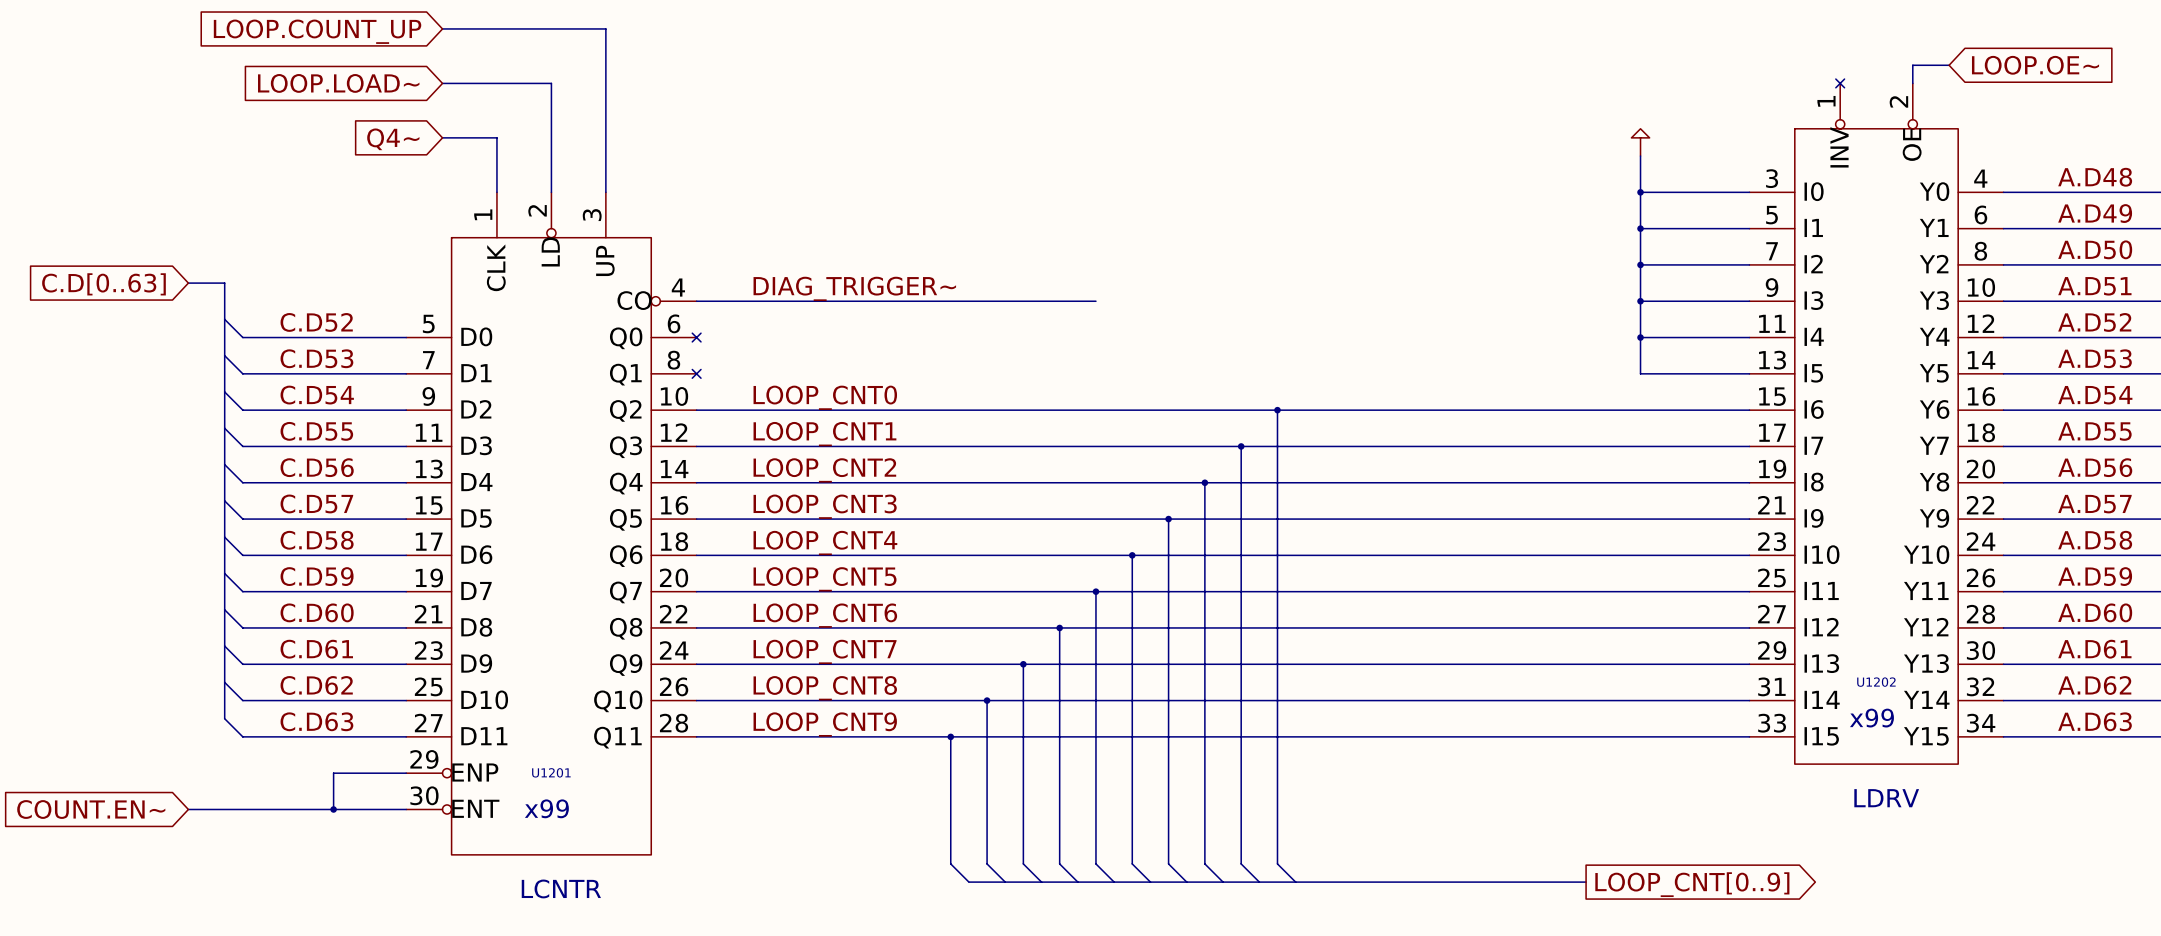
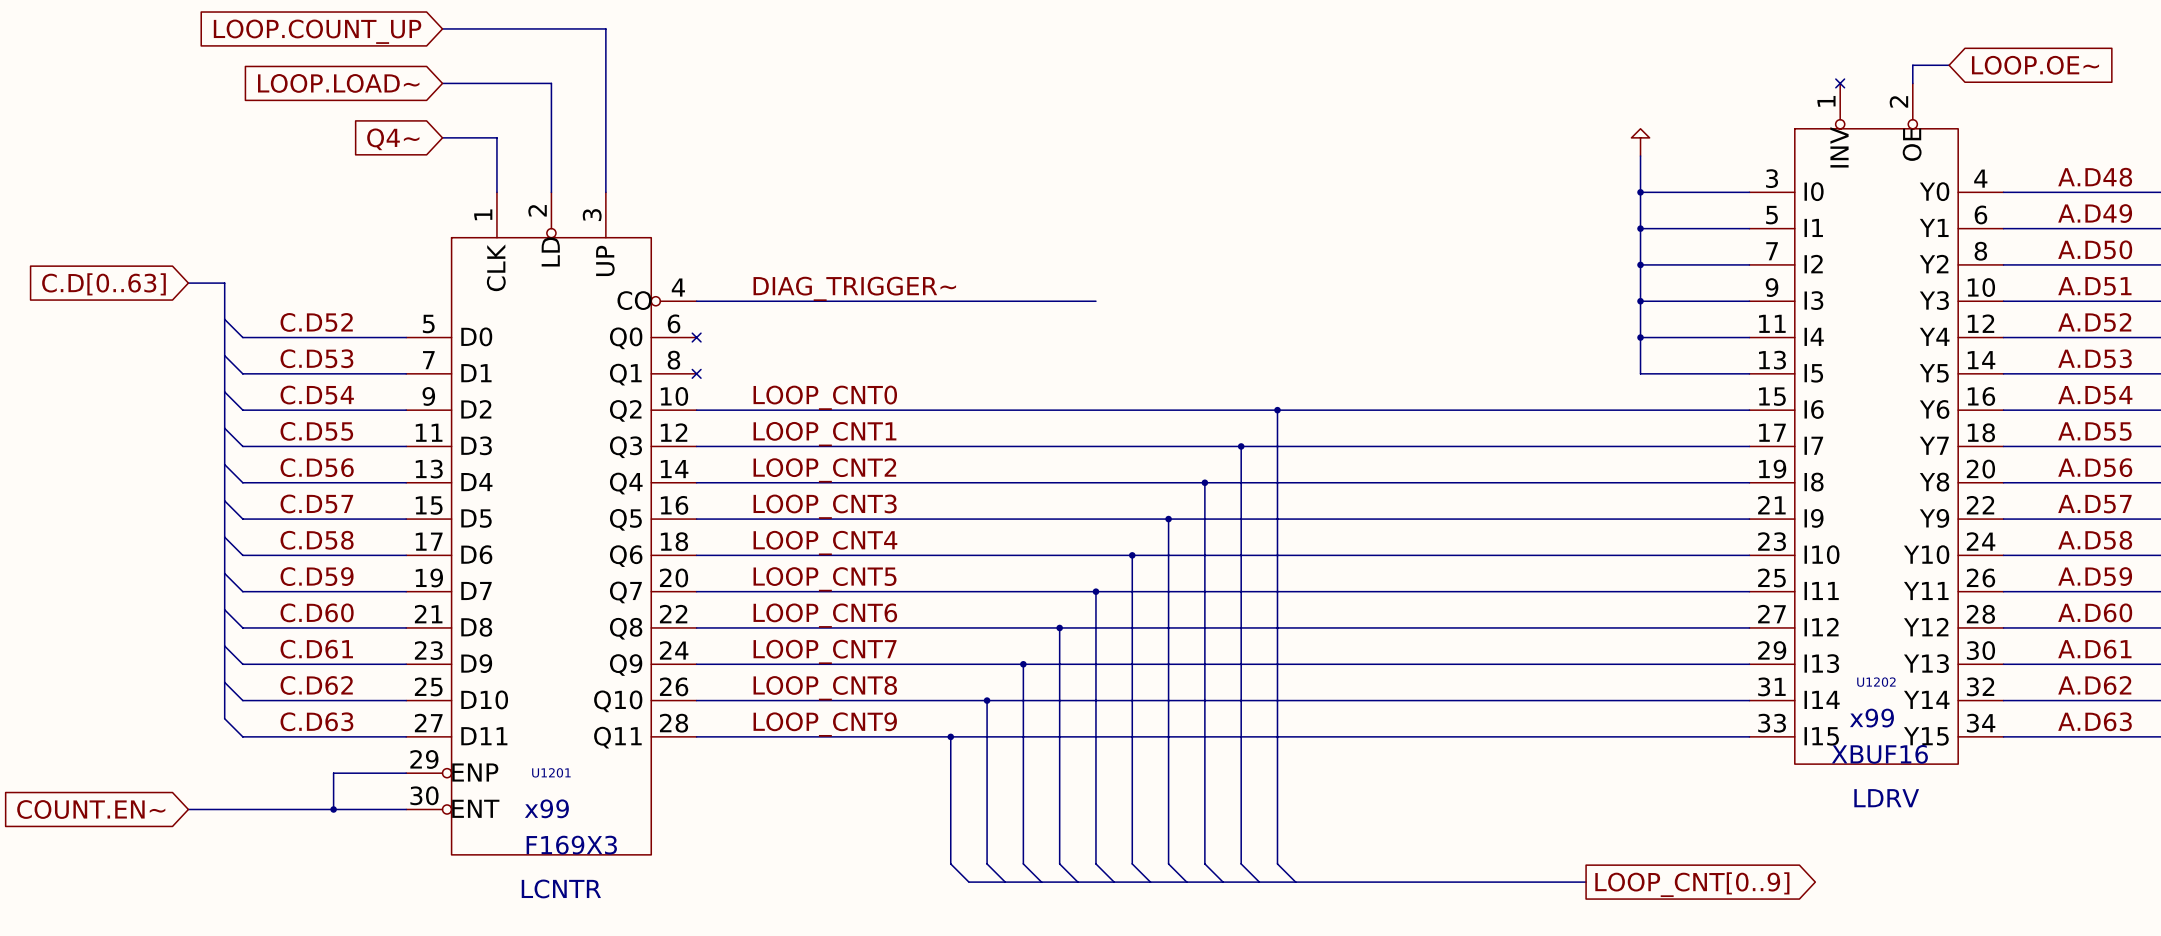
U1202 value: none -> XBUF16 (1879, 754)
U1201 value: none -> F169X3 (571, 845)

